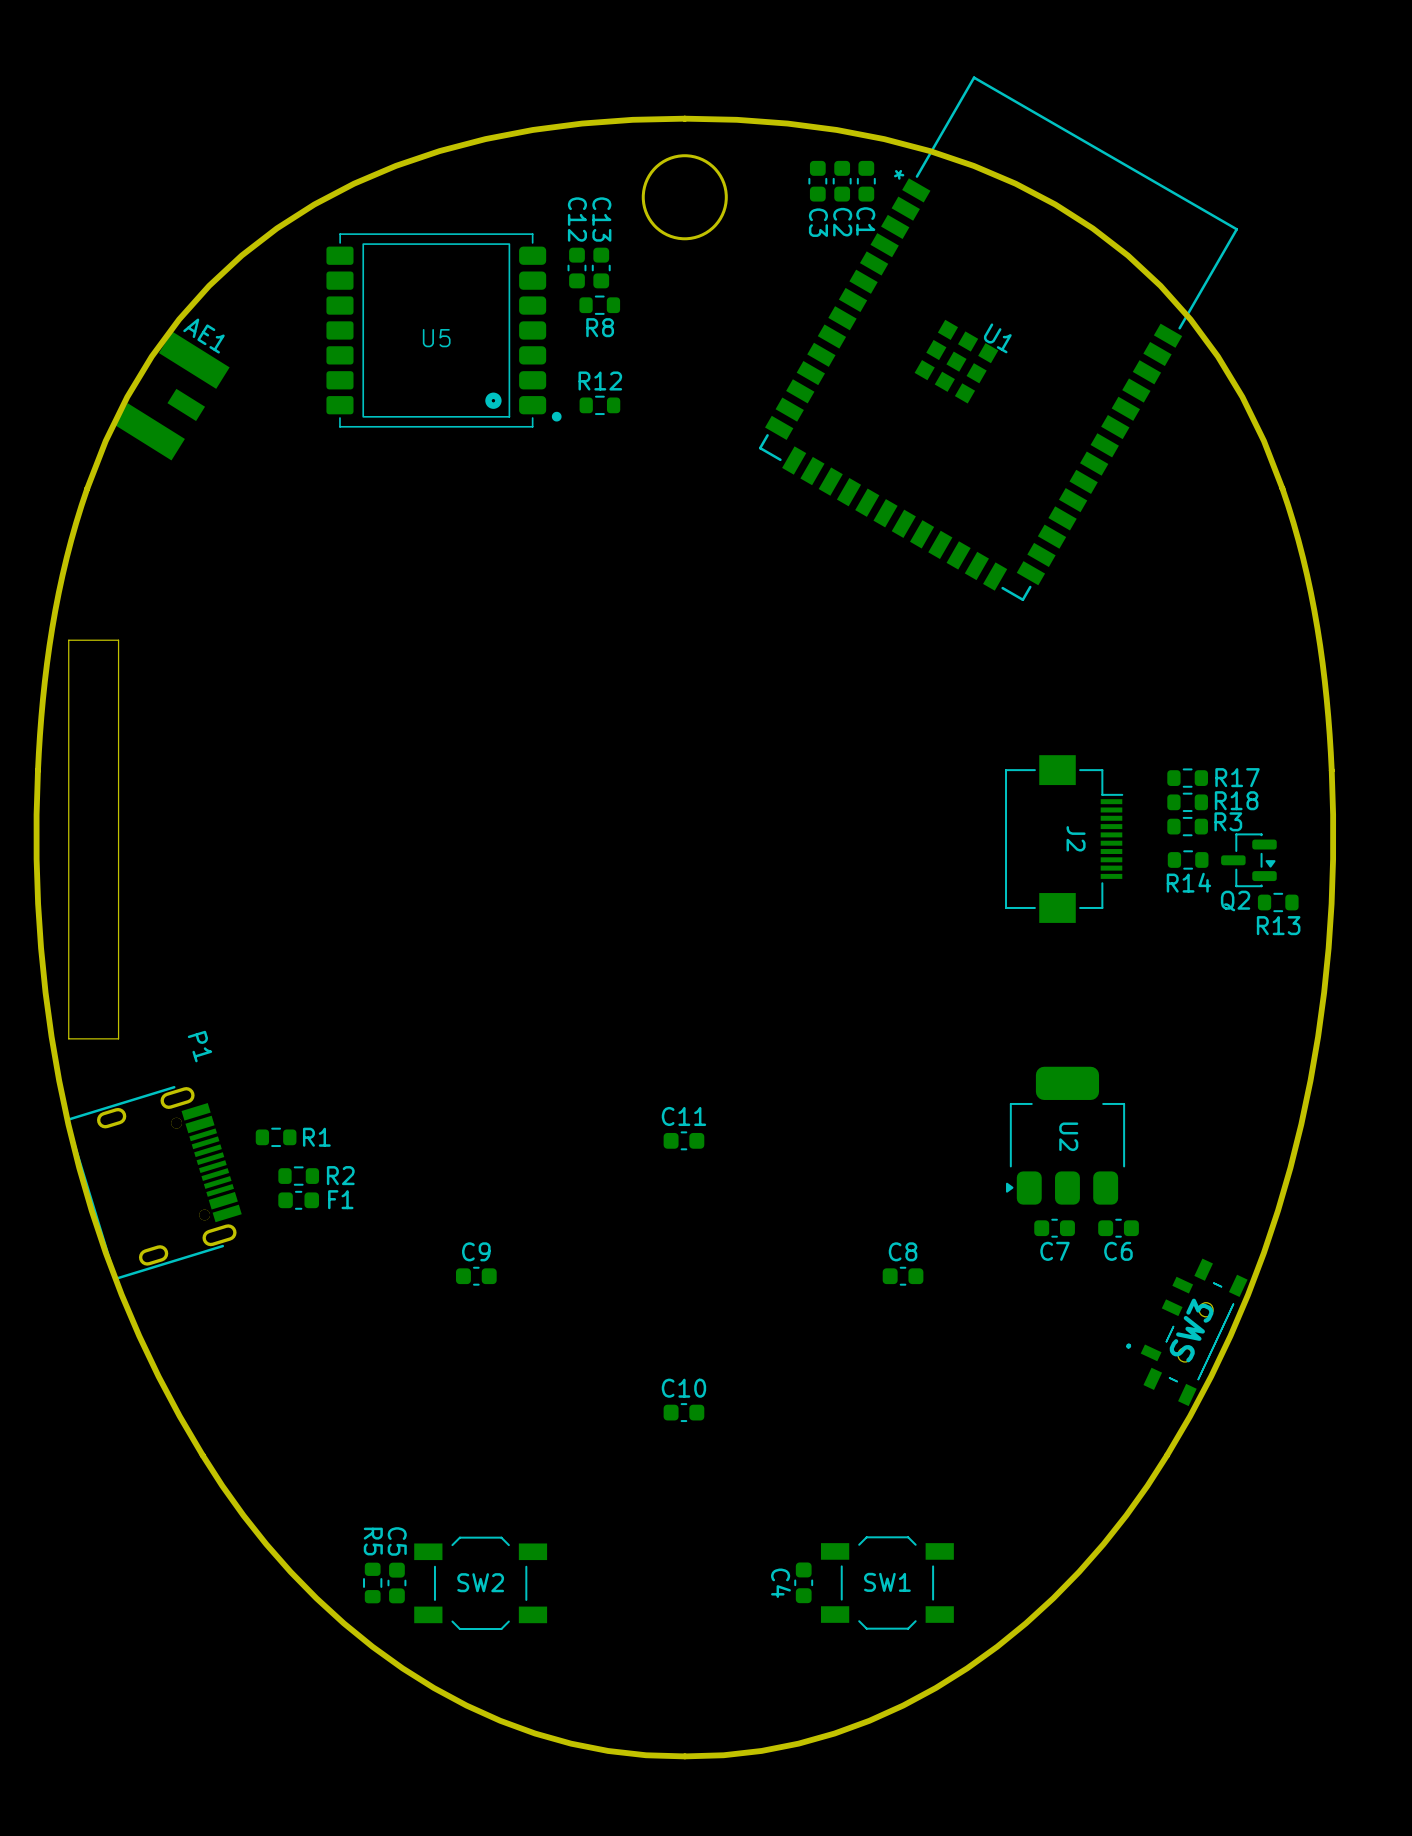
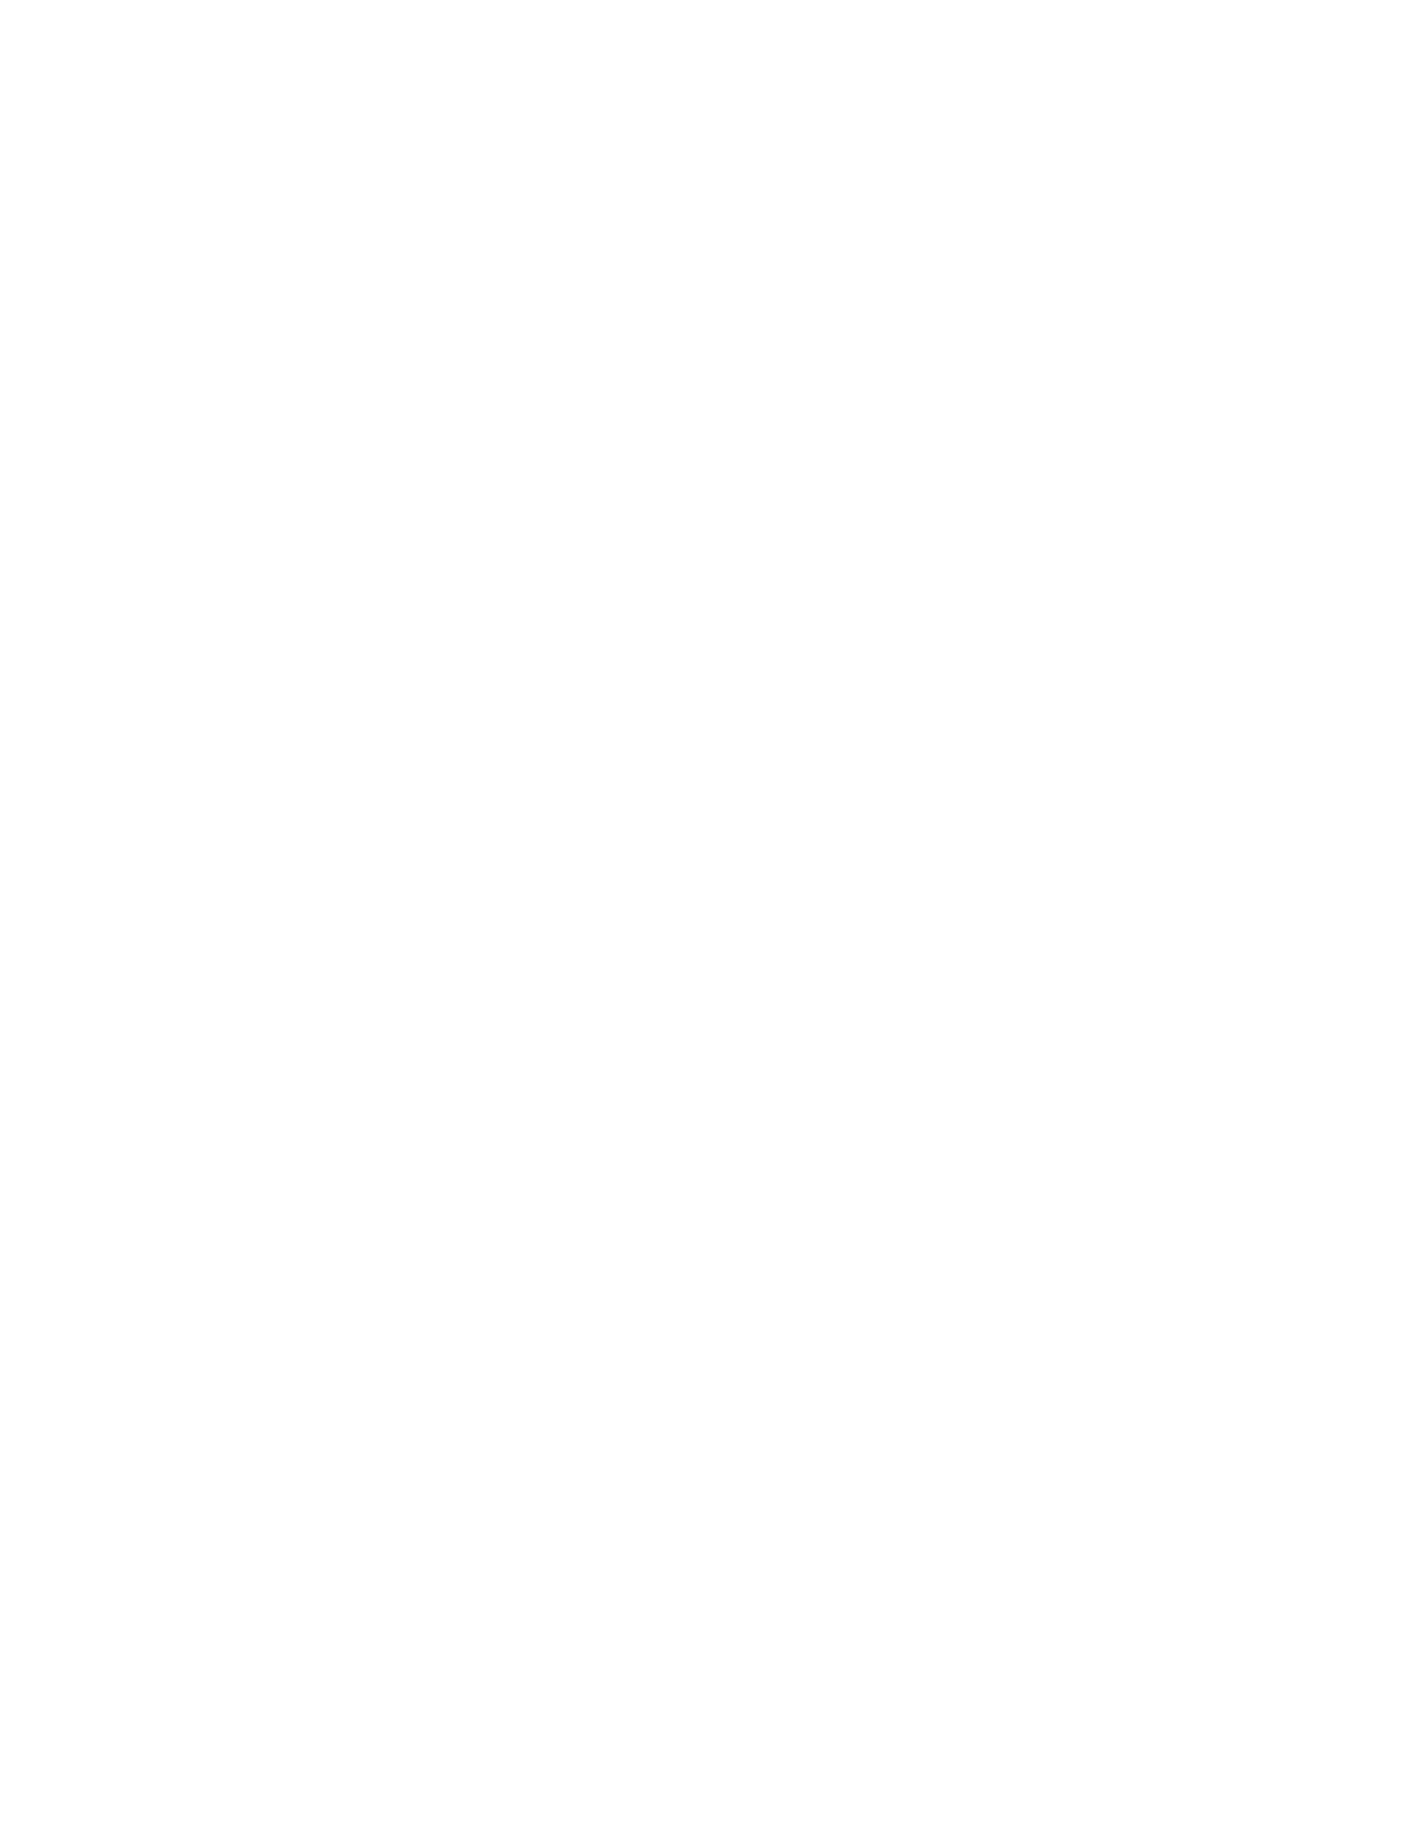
board edge: (684, 118) (787, 123) (836, 129) (884, 139) (929, 151) (973, 165) (1015, 183) (1055, 204) (1092, 228) (1127, 255) (1160, 285) (1190, 319) (1217, 356) (1242, 397) (1263, 441) (1288, 505) (1307, 575) (1320, 645) (1329, 734) (1333, 814) (1331, 903) (1324, 992) (1310, 1080) (1290, 1167) (1263, 1252) (1230, 1336) (1190, 1416) (1147, 1485) (1103, 1544) (1053, 1598) (997, 1646) (935, 1688) (869, 1720) (798, 1743) (761, 1750) (723, 1755) (684, 1756) (646, 1755) (608, 1750) (571, 1743) (500, 1720) (433, 1688) (372, 1646) (316, 1598) (266, 1544) (222, 1485) (179, 1416) (139, 1336) (105, 1252) (79, 1167) (59, 1080) (45, 992) (38, 903) (36, 814) (40, 734) (49, 645) (62, 575) (81, 505) (105, 441) (127, 396) (151, 356) (179, 319) (209, 285) (241, 255) (276, 228) (314, 204) (354, 183) (395, 165) (439, 151) (485, 139) (532, 129) (582, 123) (684, 118) -> none
round board edge: [641, 154, 728, 241] -> none
C3: (817, 181) -> none
C2: (842, 181) -> none
C1: (866, 181) -> none
C12: (576, 268) -> none
C13: (601, 268) -> none
R8: (599, 305) -> none
U5: (444, 330) -> none
U1: (998, 338) -> none
AE1: (171, 396) -> none
R12: (599, 405) -> none
board edge: (118, 640) (68, 640) (68, 1038) (118, 1038) (118, 640) -> none
R17: (1187, 778) -> none
R18: (1187, 802) -> none
R3: (1187, 826) -> none
J2: (1064, 839) -> none
R14: (1188, 859) -> none
Q2: (1248, 860) -> none
R13: (1278, 902) -> none
U2: (1065, 1135) -> none
R1: (276, 1137) -> none
C11: (683, 1140) -> none
R2: (298, 1176) -> none
P1: (153, 1183) -> none
F1: (298, 1200) -> none
C7: (1054, 1228) -> none
C6: (1118, 1228) -> none
C9: (476, 1276) -> none
C8: (903, 1276) -> none
SW3: (1186, 1332) -> none
C10: (683, 1412) -> none
R5: (372, 1582) -> none
C5: (396, 1582) -> none
C4: (803, 1582) -> none
SW1: (887, 1582) -> none
SW2: (480, 1583) -> none

